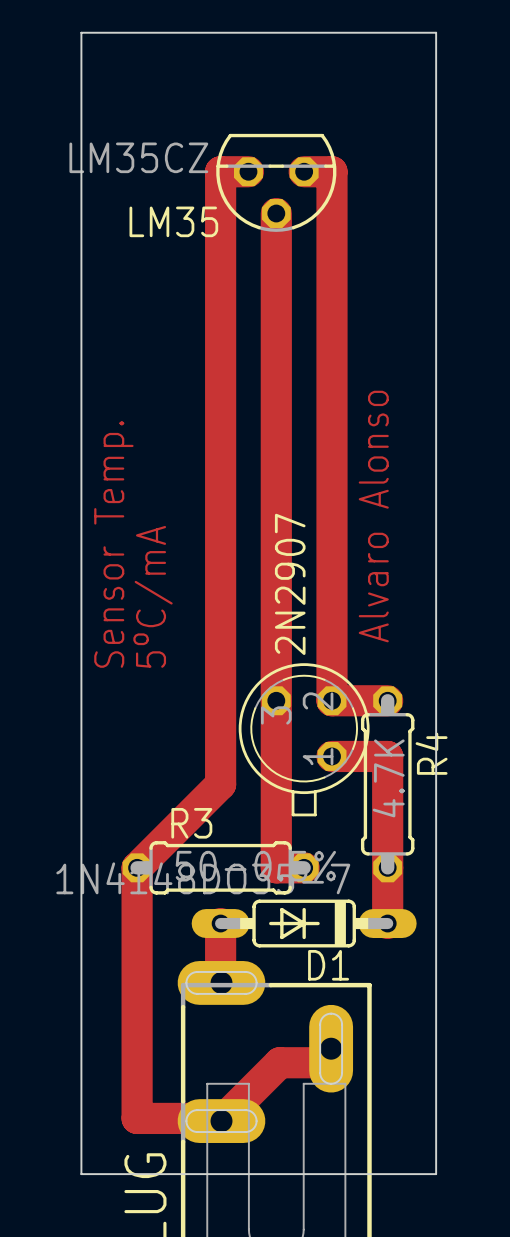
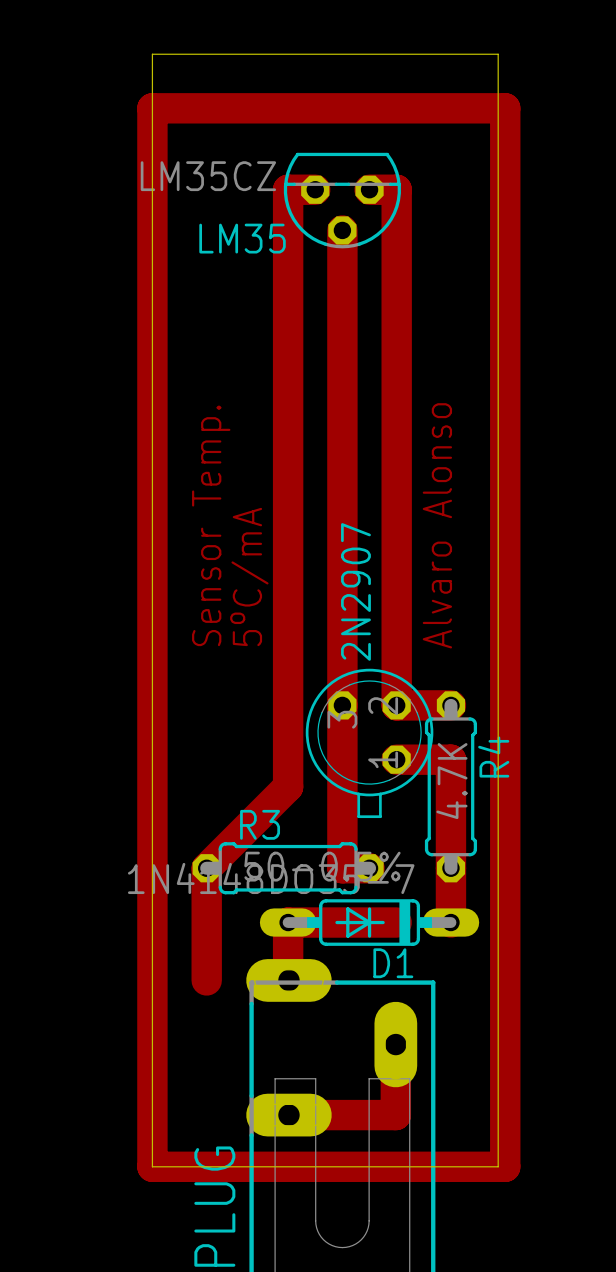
top track: none -> (152, 108) (505, 108) (505, 1166) (152, 1166) (152, 108)
text position: Sensor Temp. (113, 544) -> Sensor Temp. (211, 525)
text position: 5ºC/mA (153, 596) -> 5ºC/mA (249, 577)
top track: none -> (288, 922) (396, 922)
top track: (137, 982) (137, 1118) (221, 1118) (221, 1121) (279, 1062) (331, 1062) -> (288, 1115) (395, 1115) (395, 1058)

